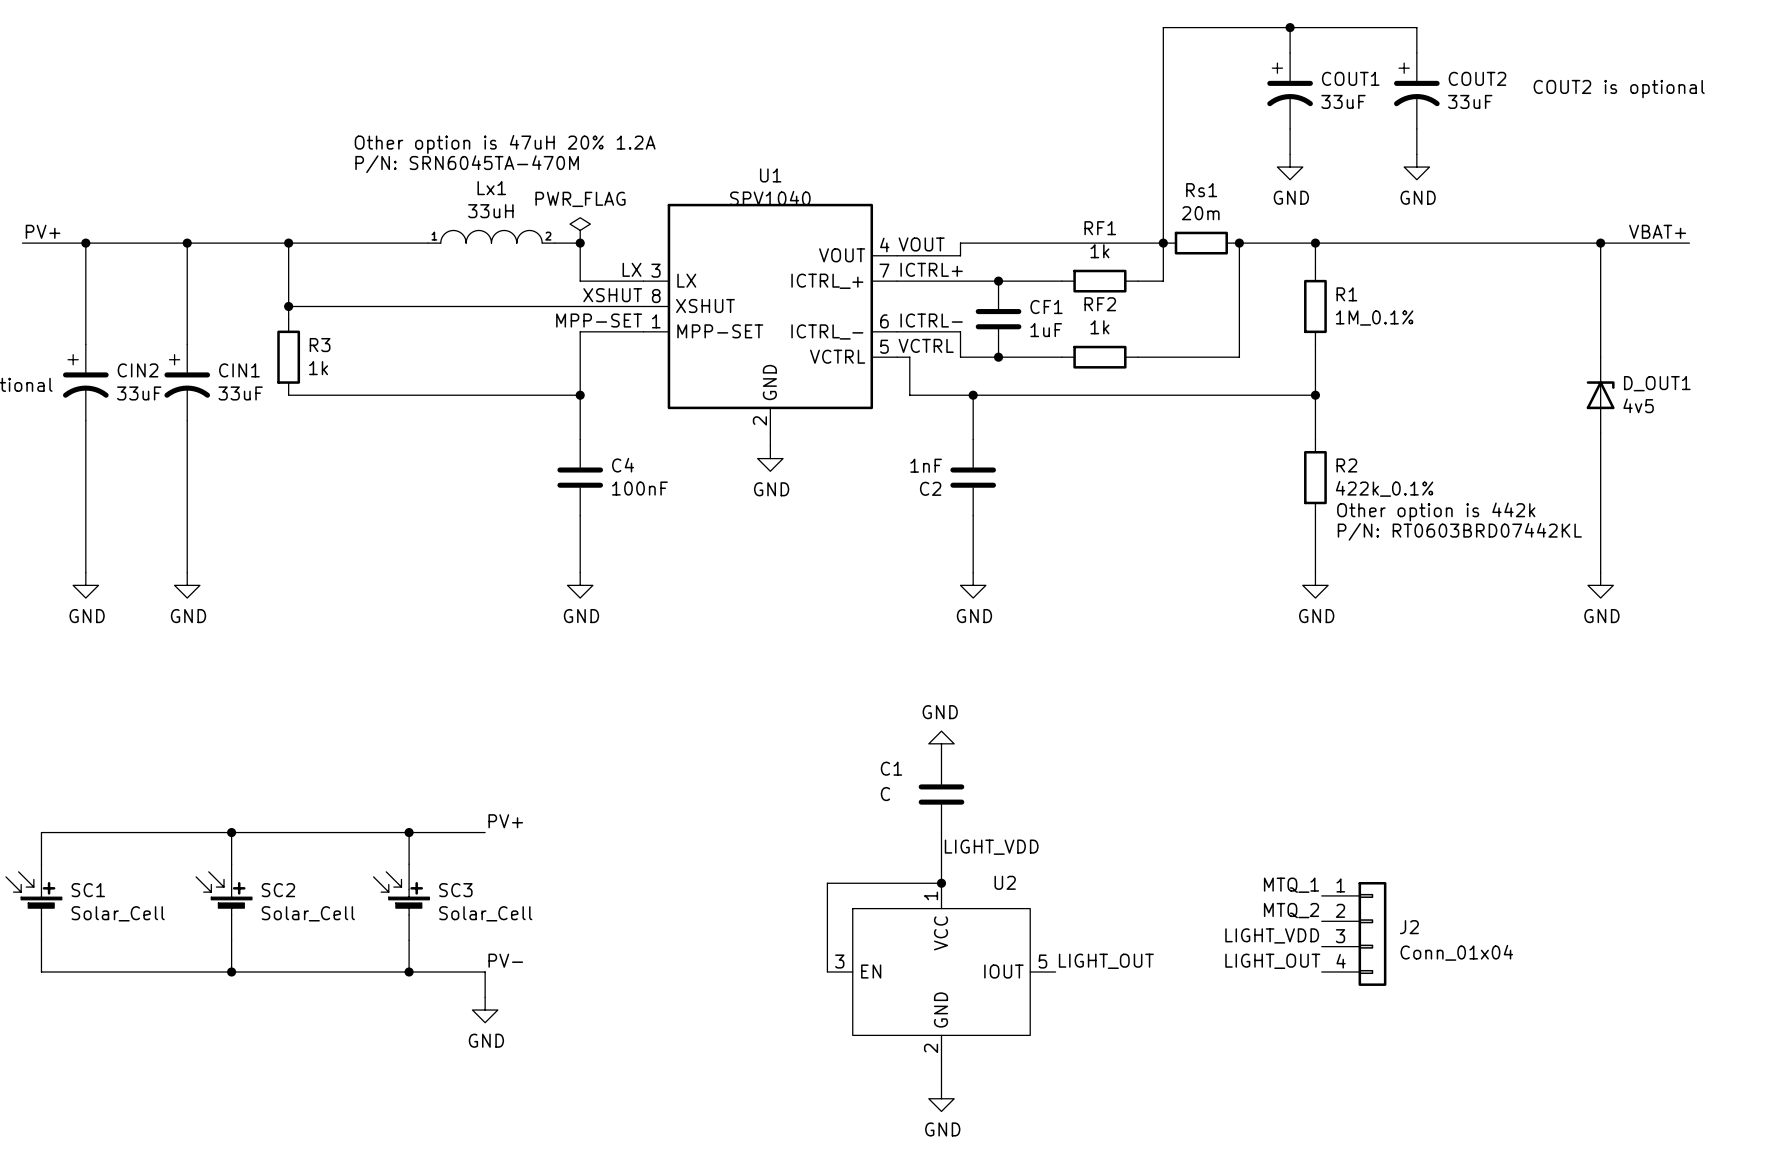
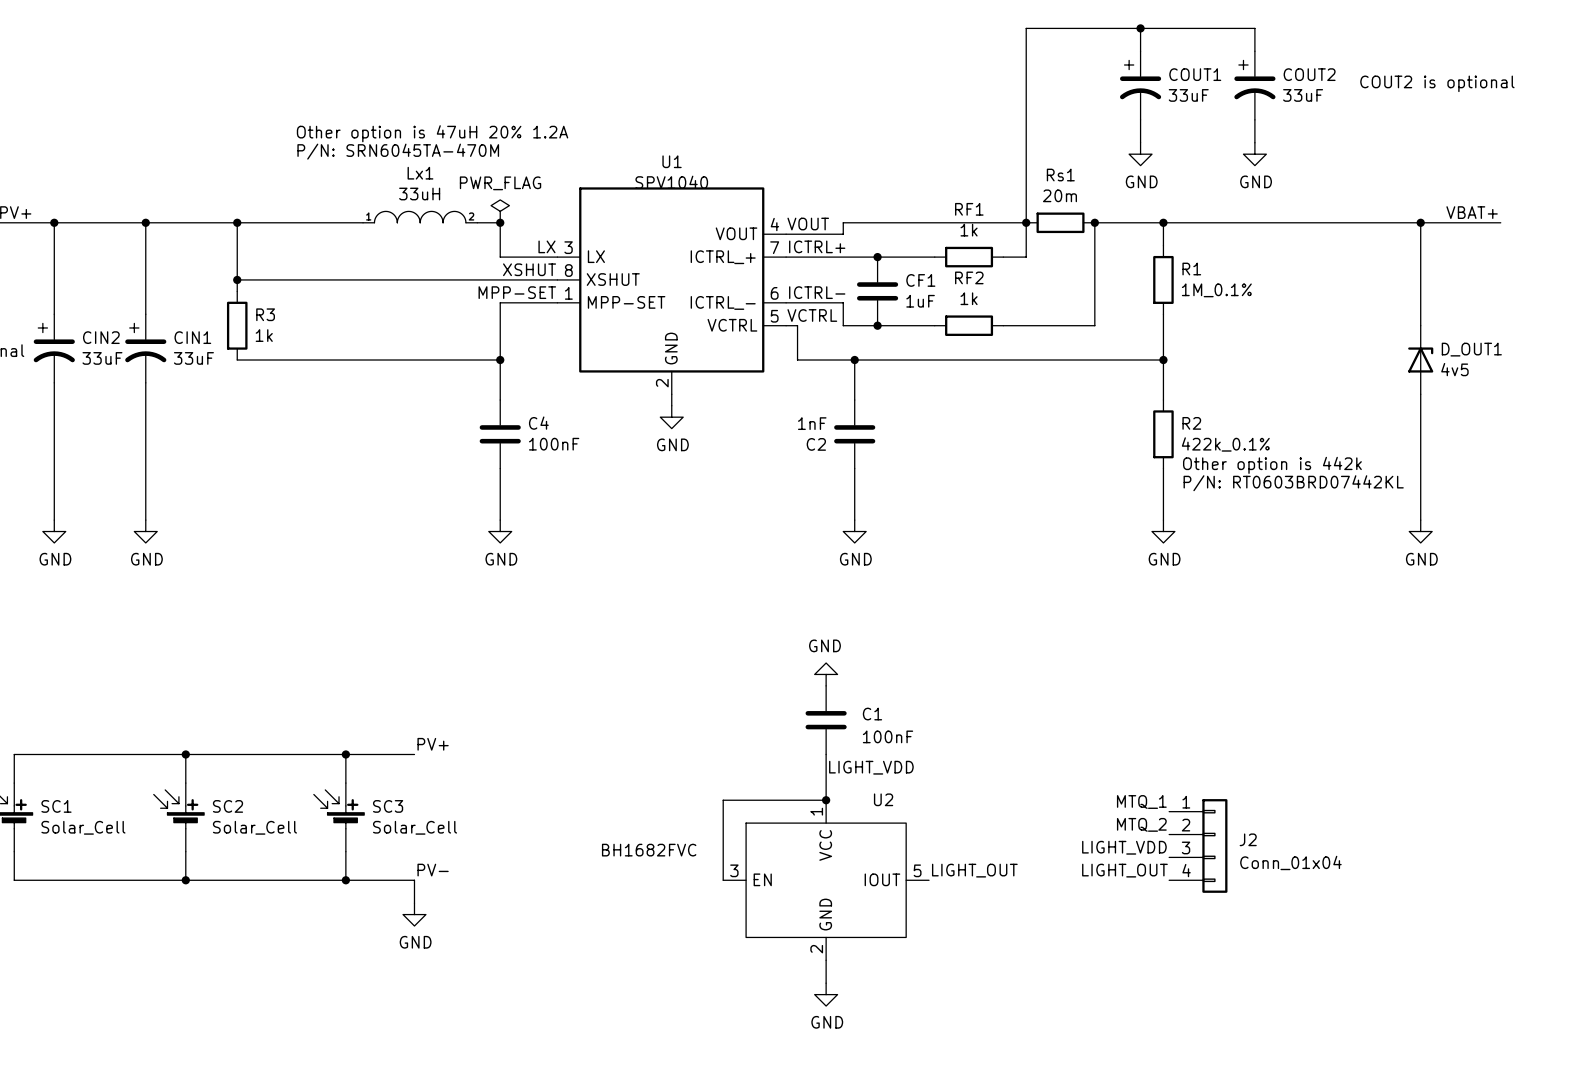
C1 name position: C1 (891, 768) -> C1 (872, 714)
C1 value: C (885, 794) -> 100nF (888, 736)
U2 value: none -> BH1682FVC (649, 850)

